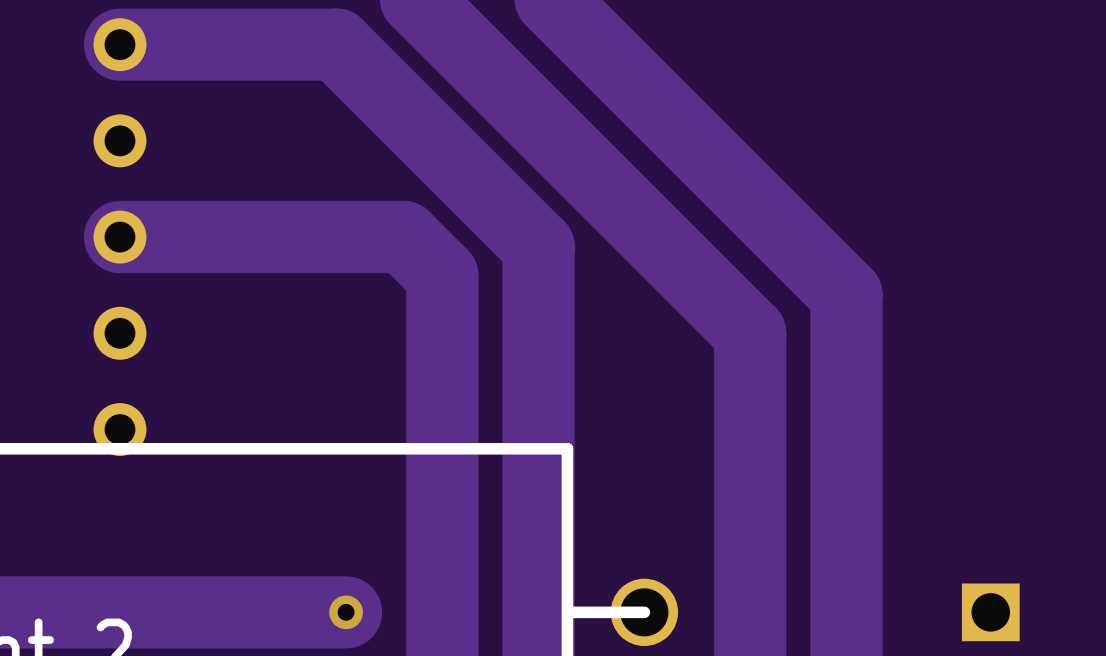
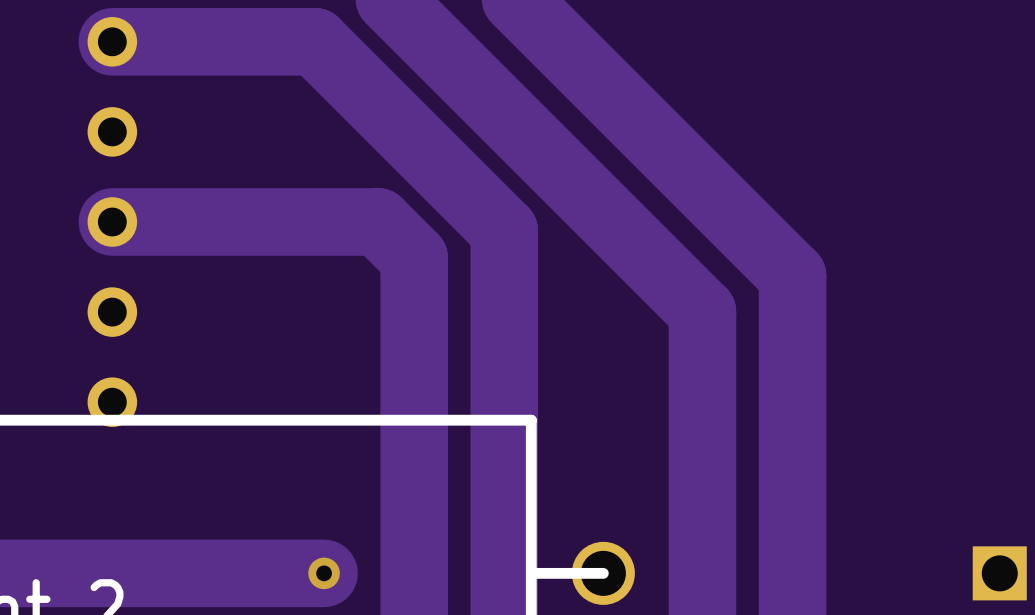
part position: (990, 612) -> (999, 573)

